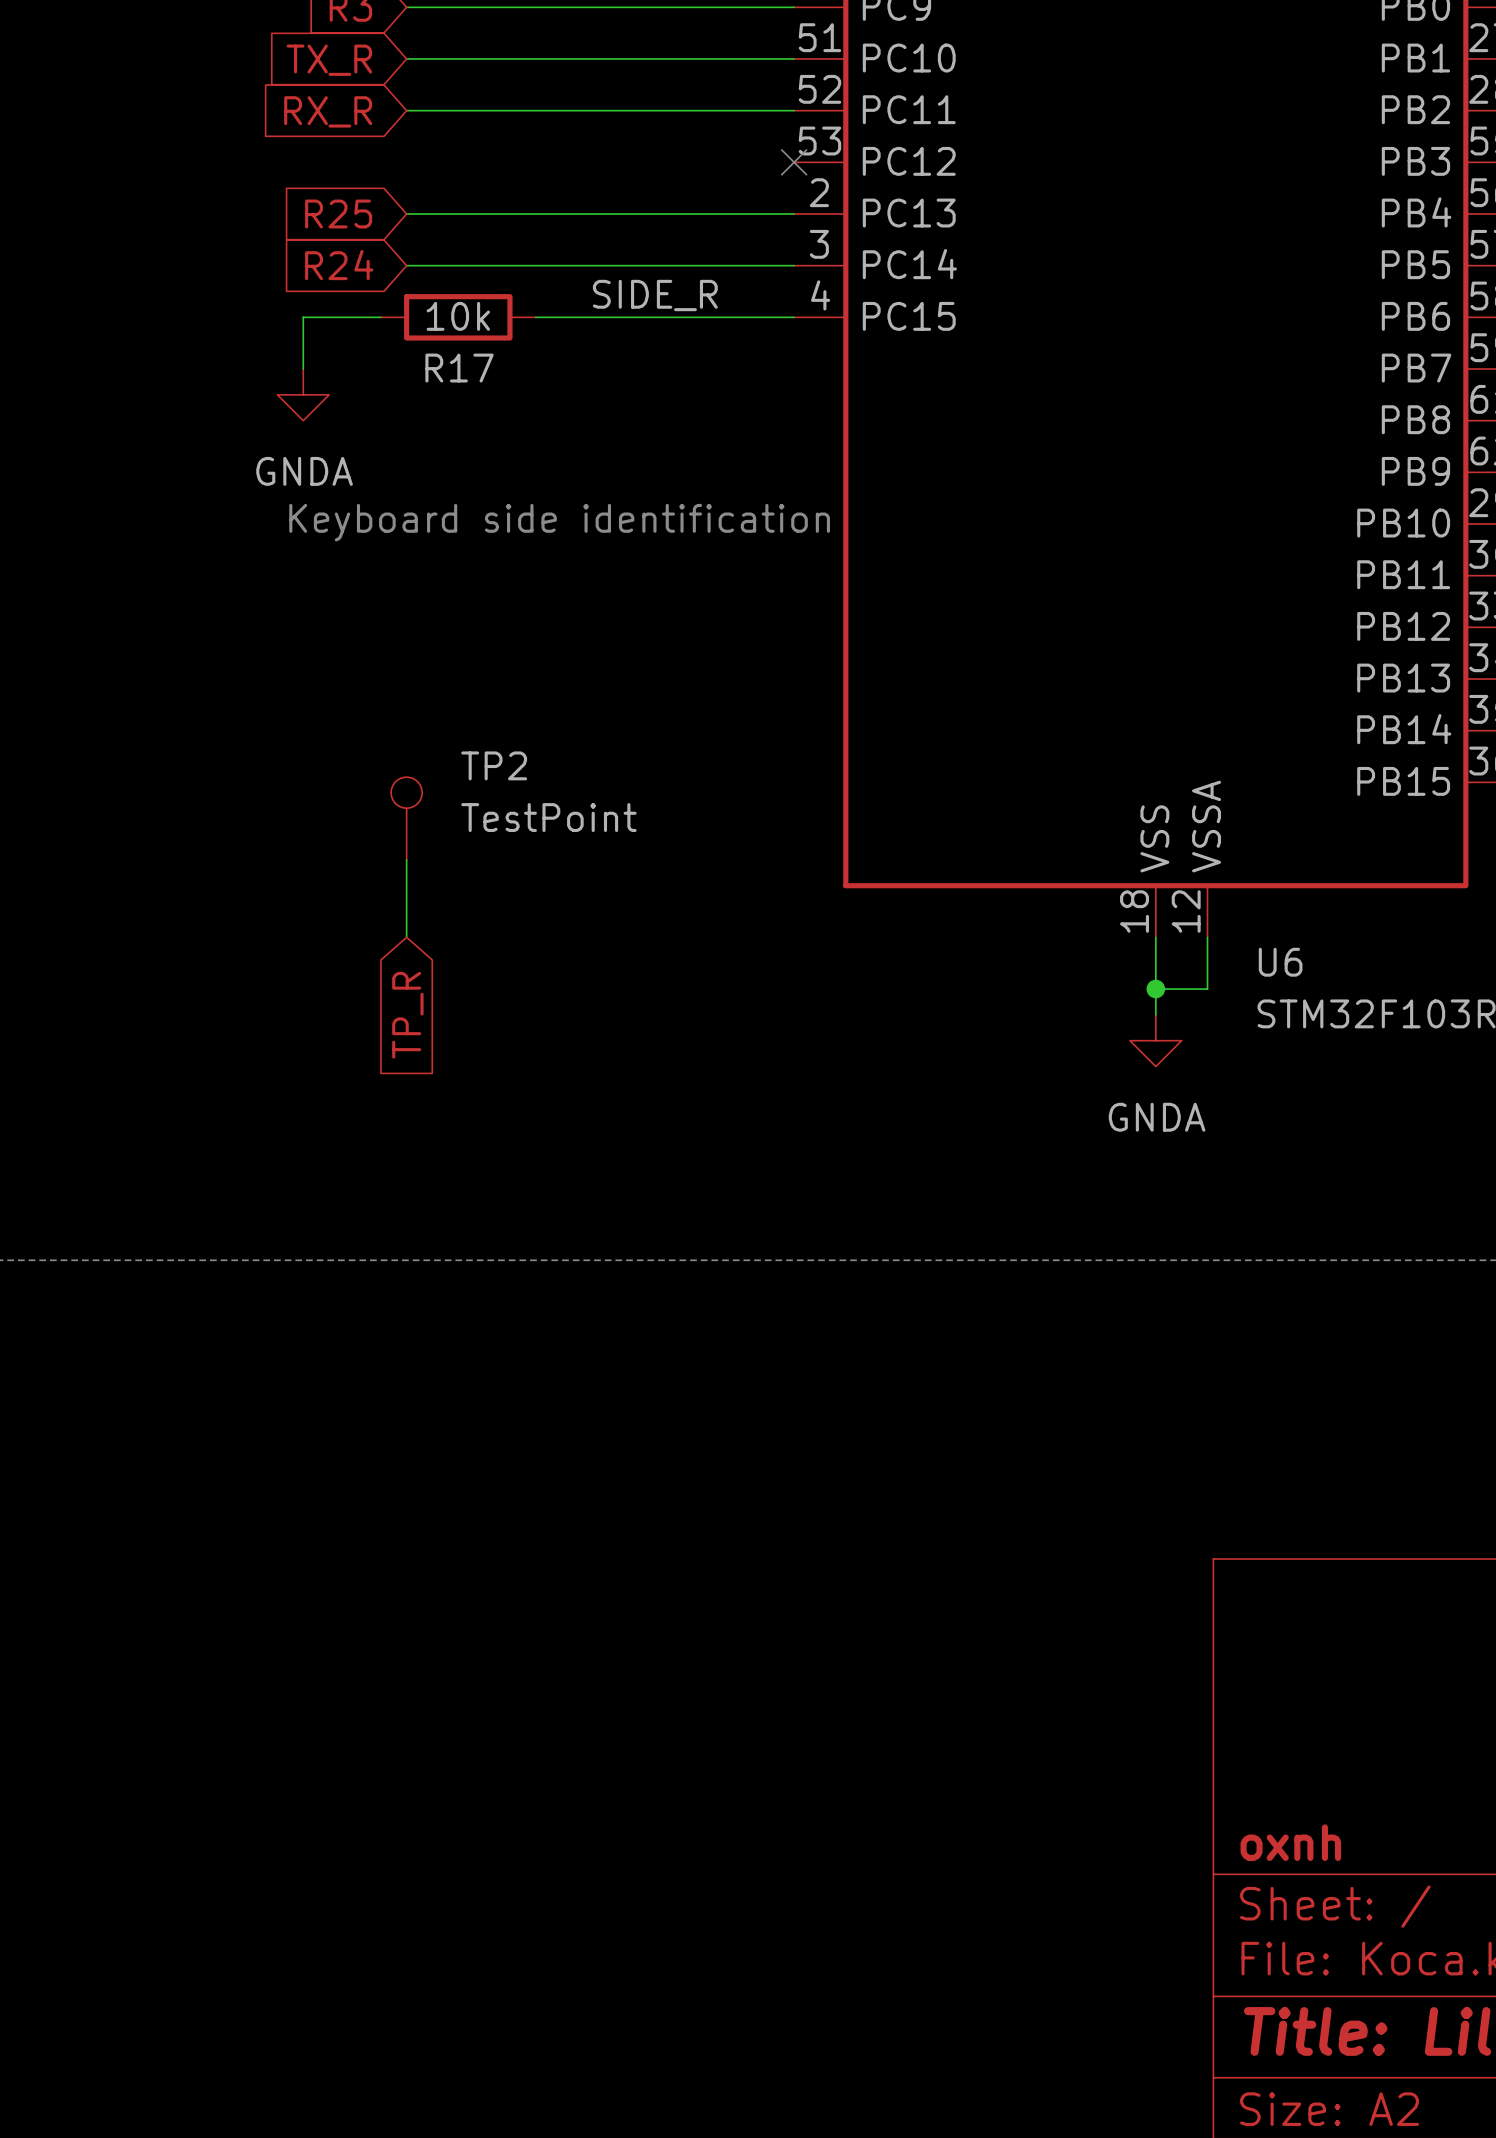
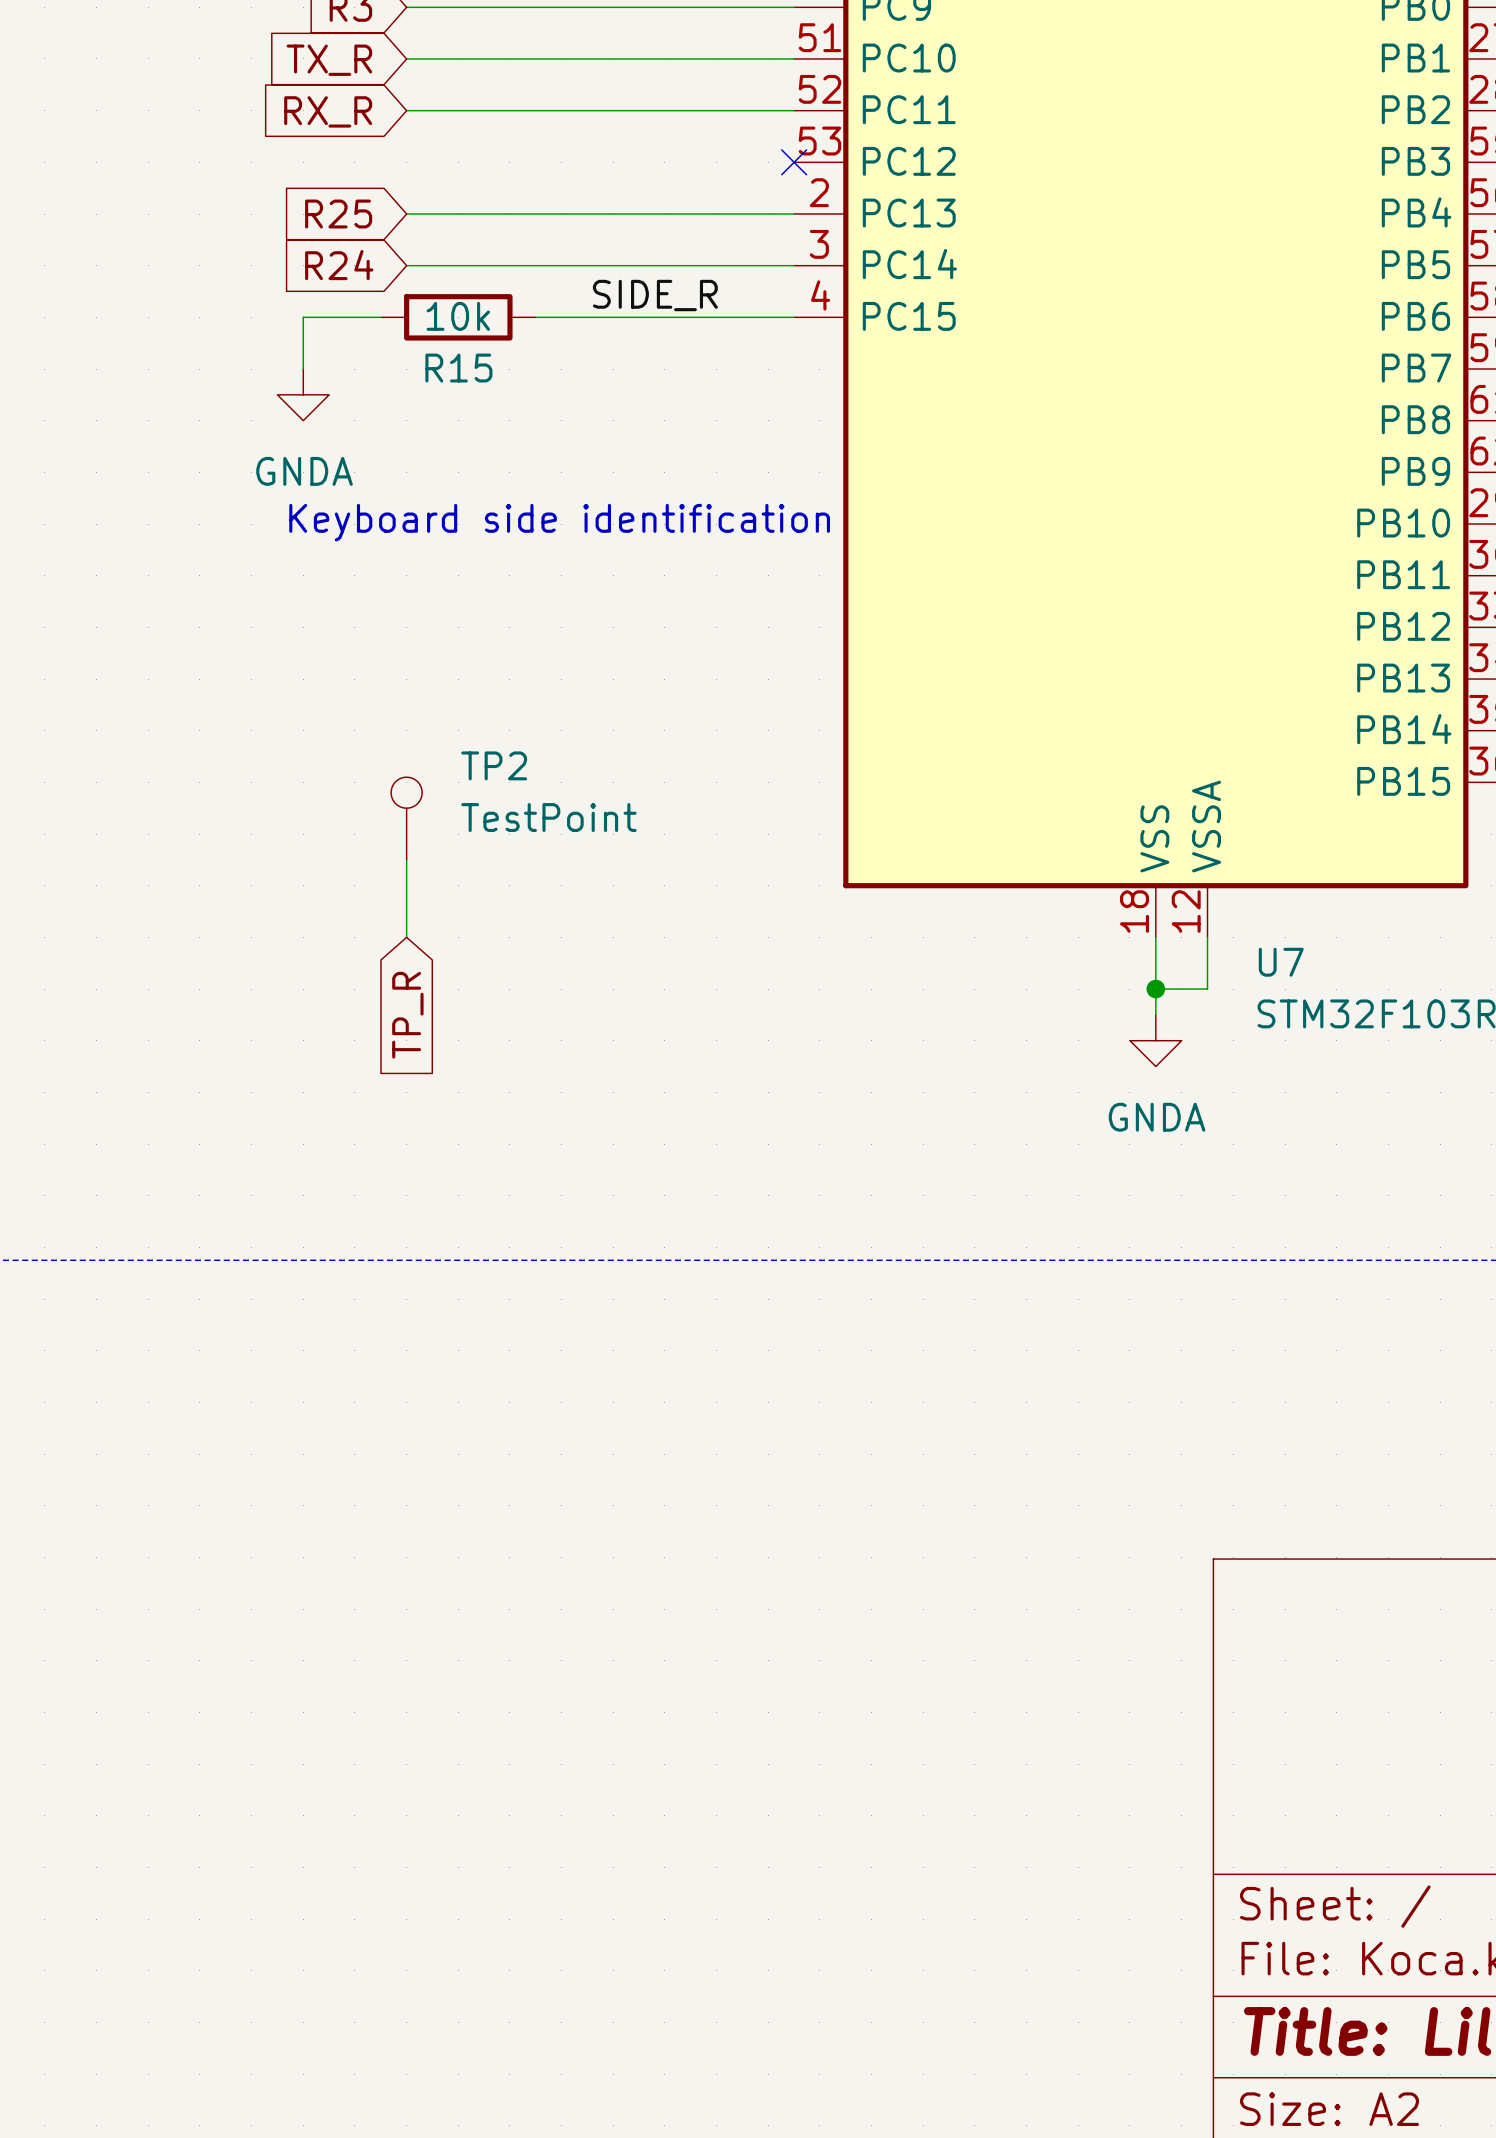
R17 name: R17 (459, 368) -> R15 (458, 368)
U6 name: U6 (1280, 962) -> U7 (1281, 962)
title block: oxnh (1290, 1842) -> none

